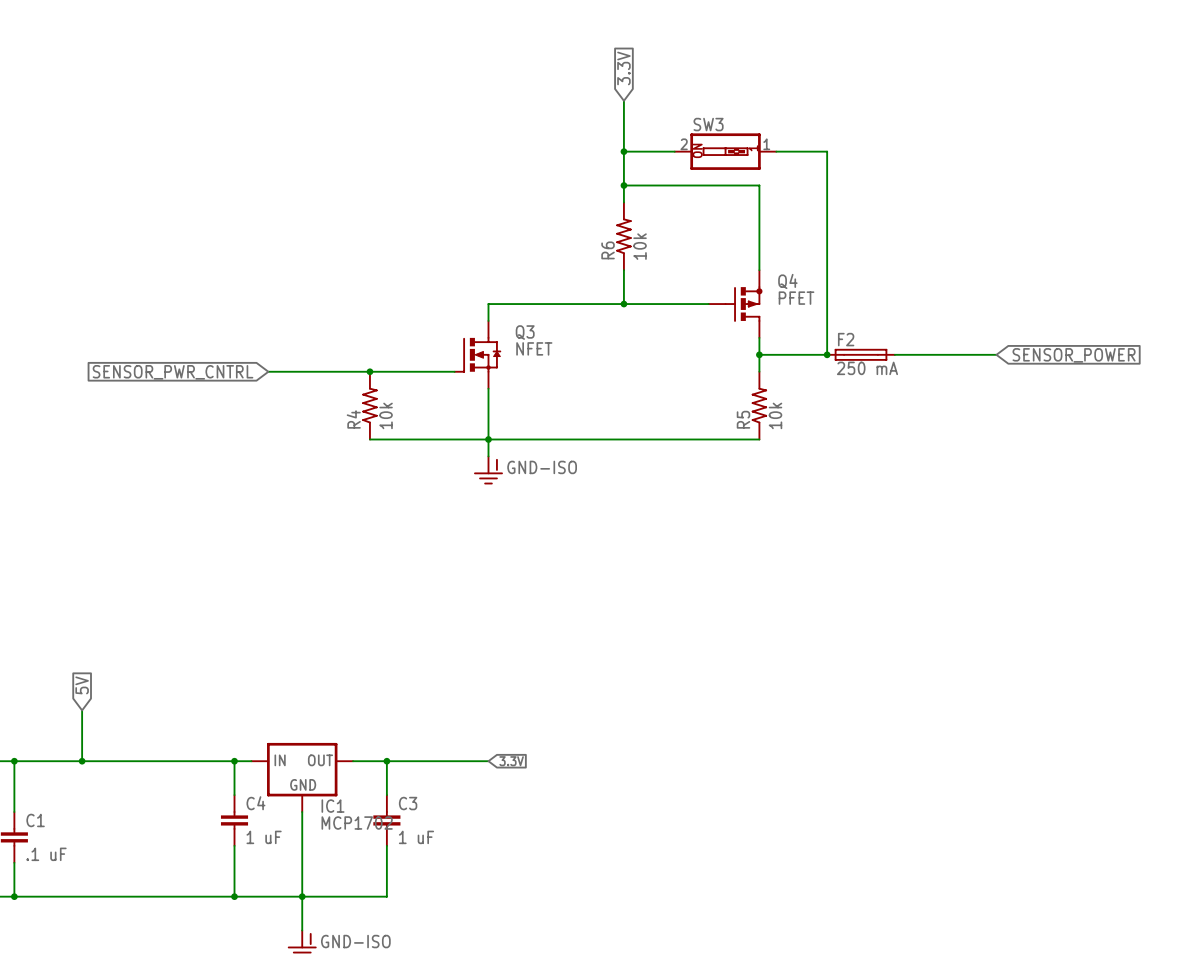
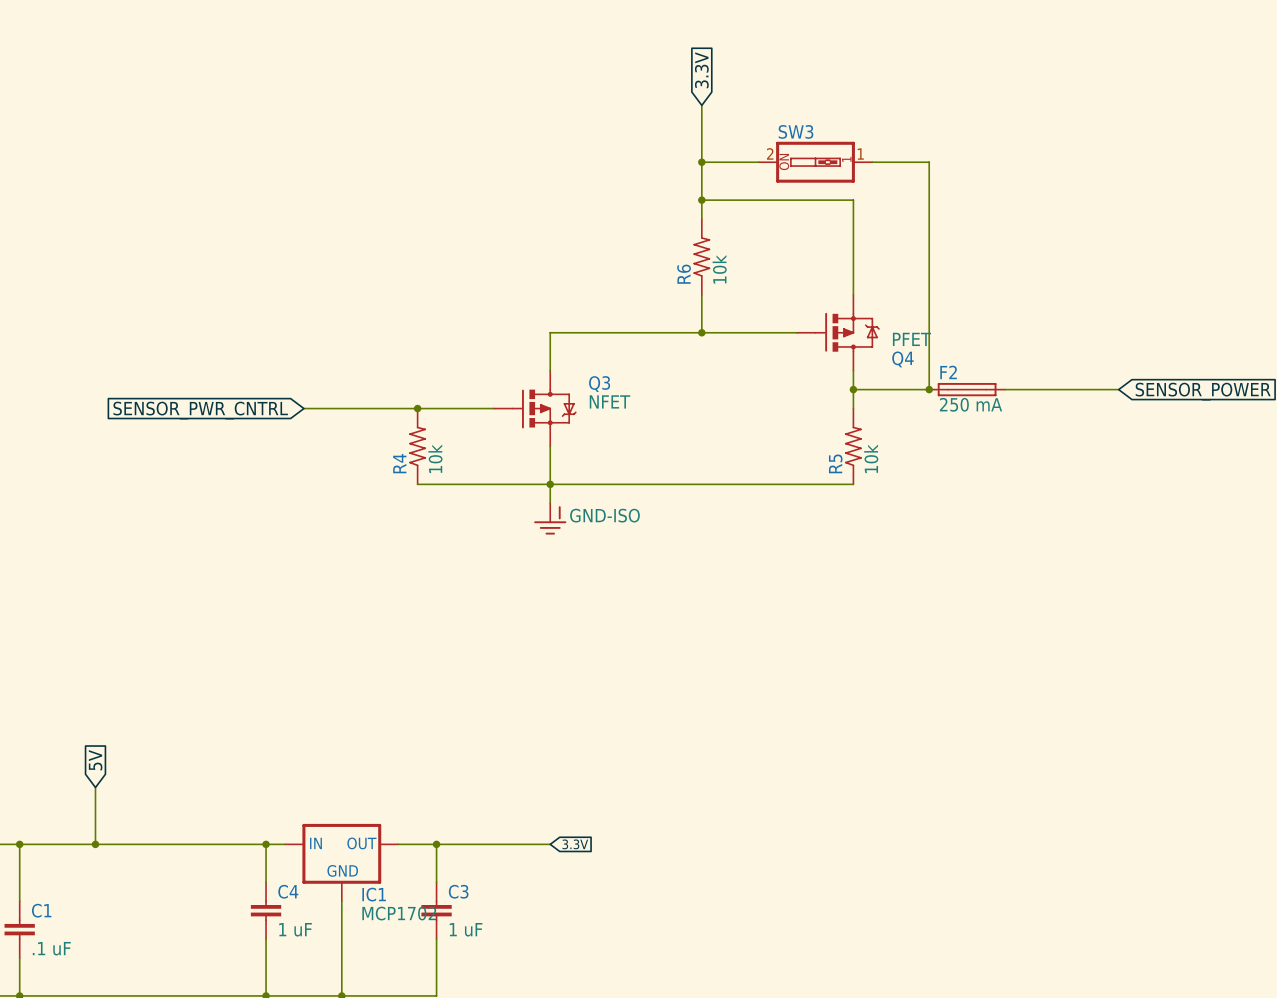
Q4 symbol: [708, 270, 763, 338] -> [796, 294, 880, 371]
Q4 name position: Q4 (787, 281) -> Q4 (902, 359)
Q4 value position: PFET (796, 298) -> PFET (911, 339)
Q3 symbol: [454, 320, 501, 389] -> [493, 370, 577, 447]

